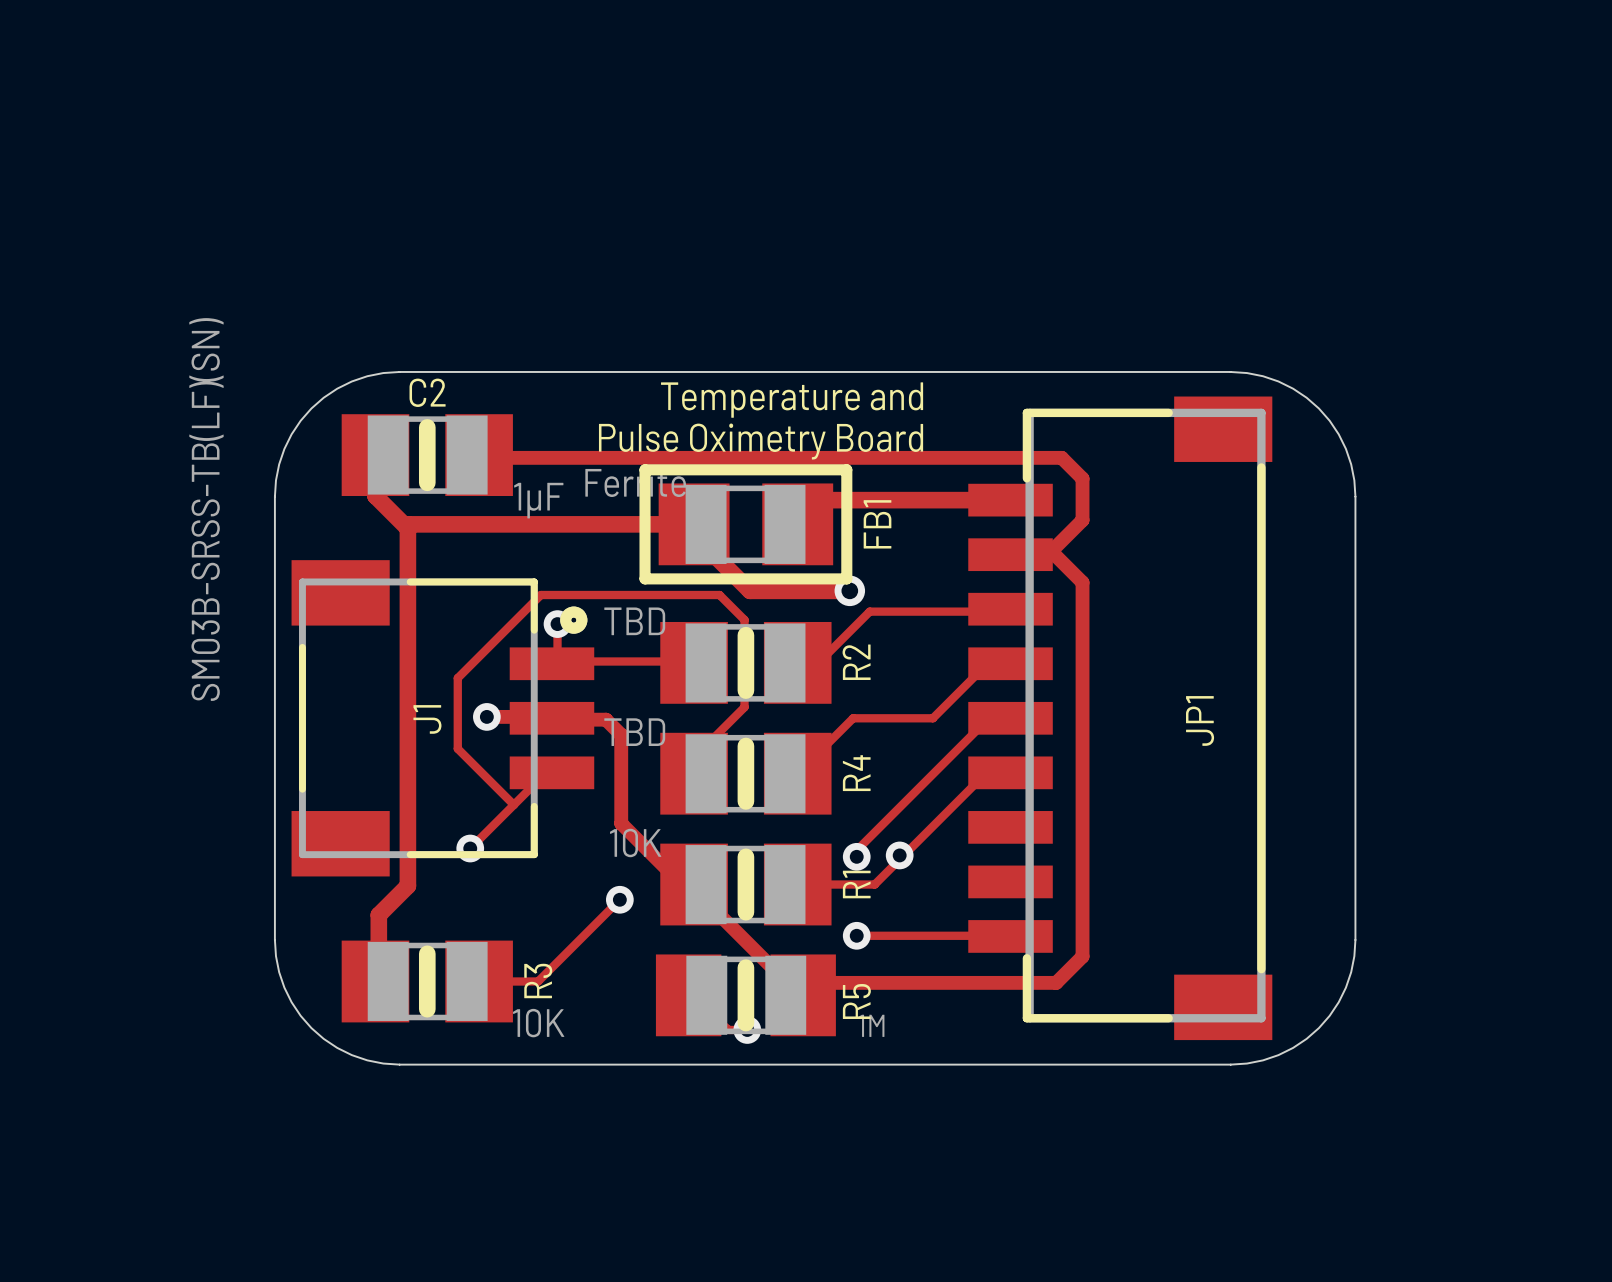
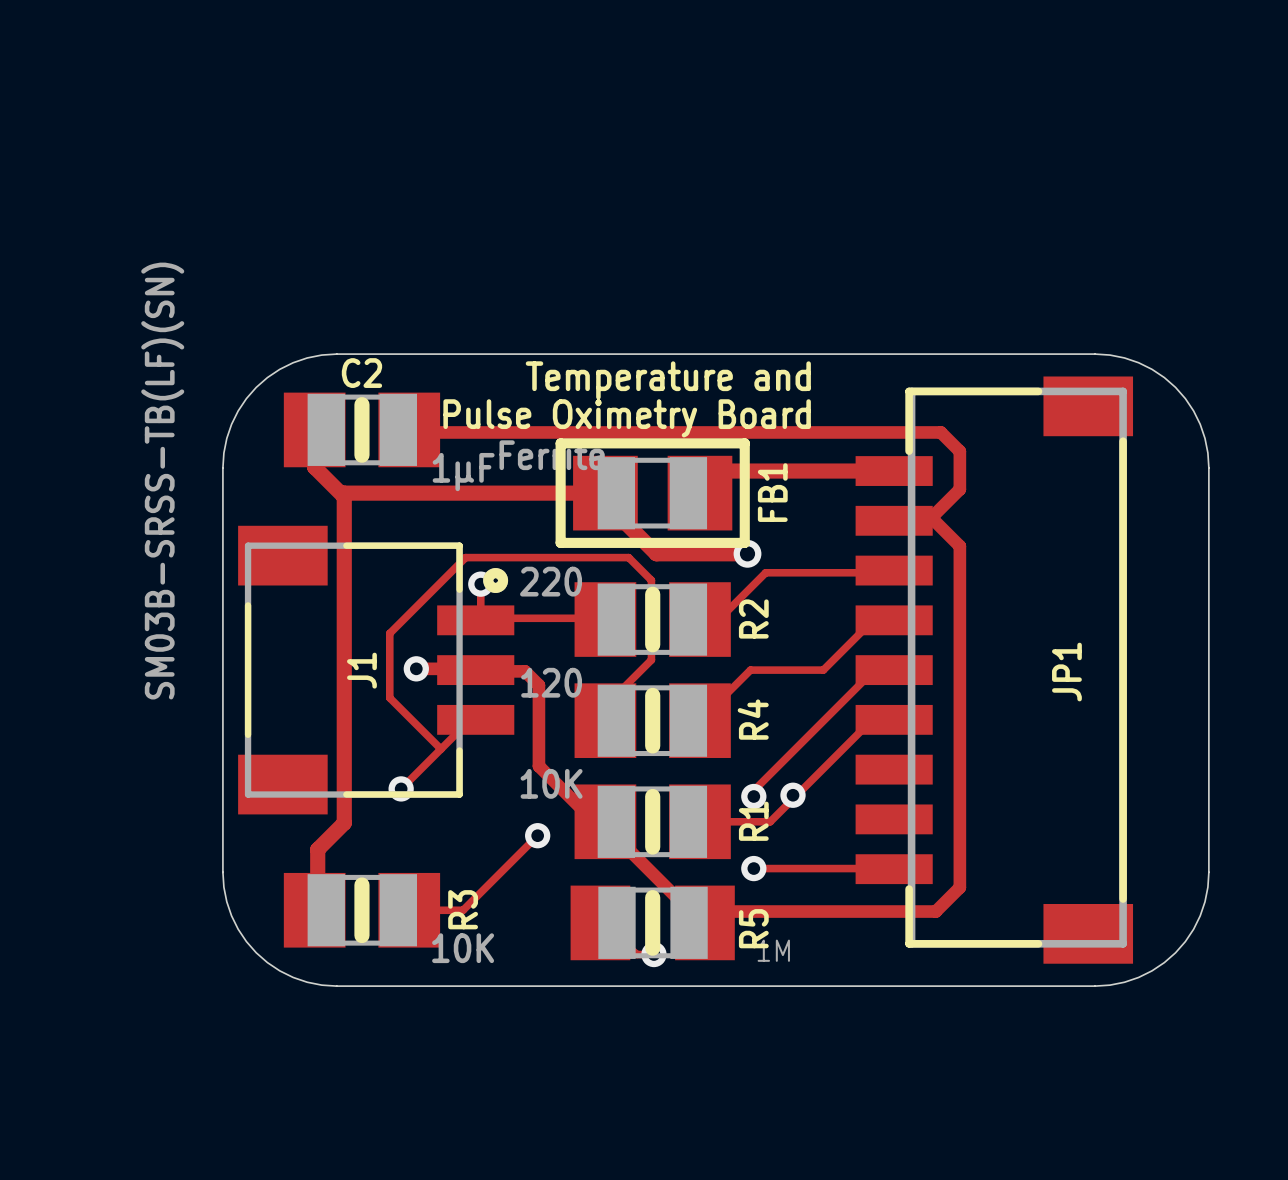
R2 value: TBD (634, 621) -> 220 (551, 581)
R4 value: TBD (634, 732) -> 120 (551, 682)

